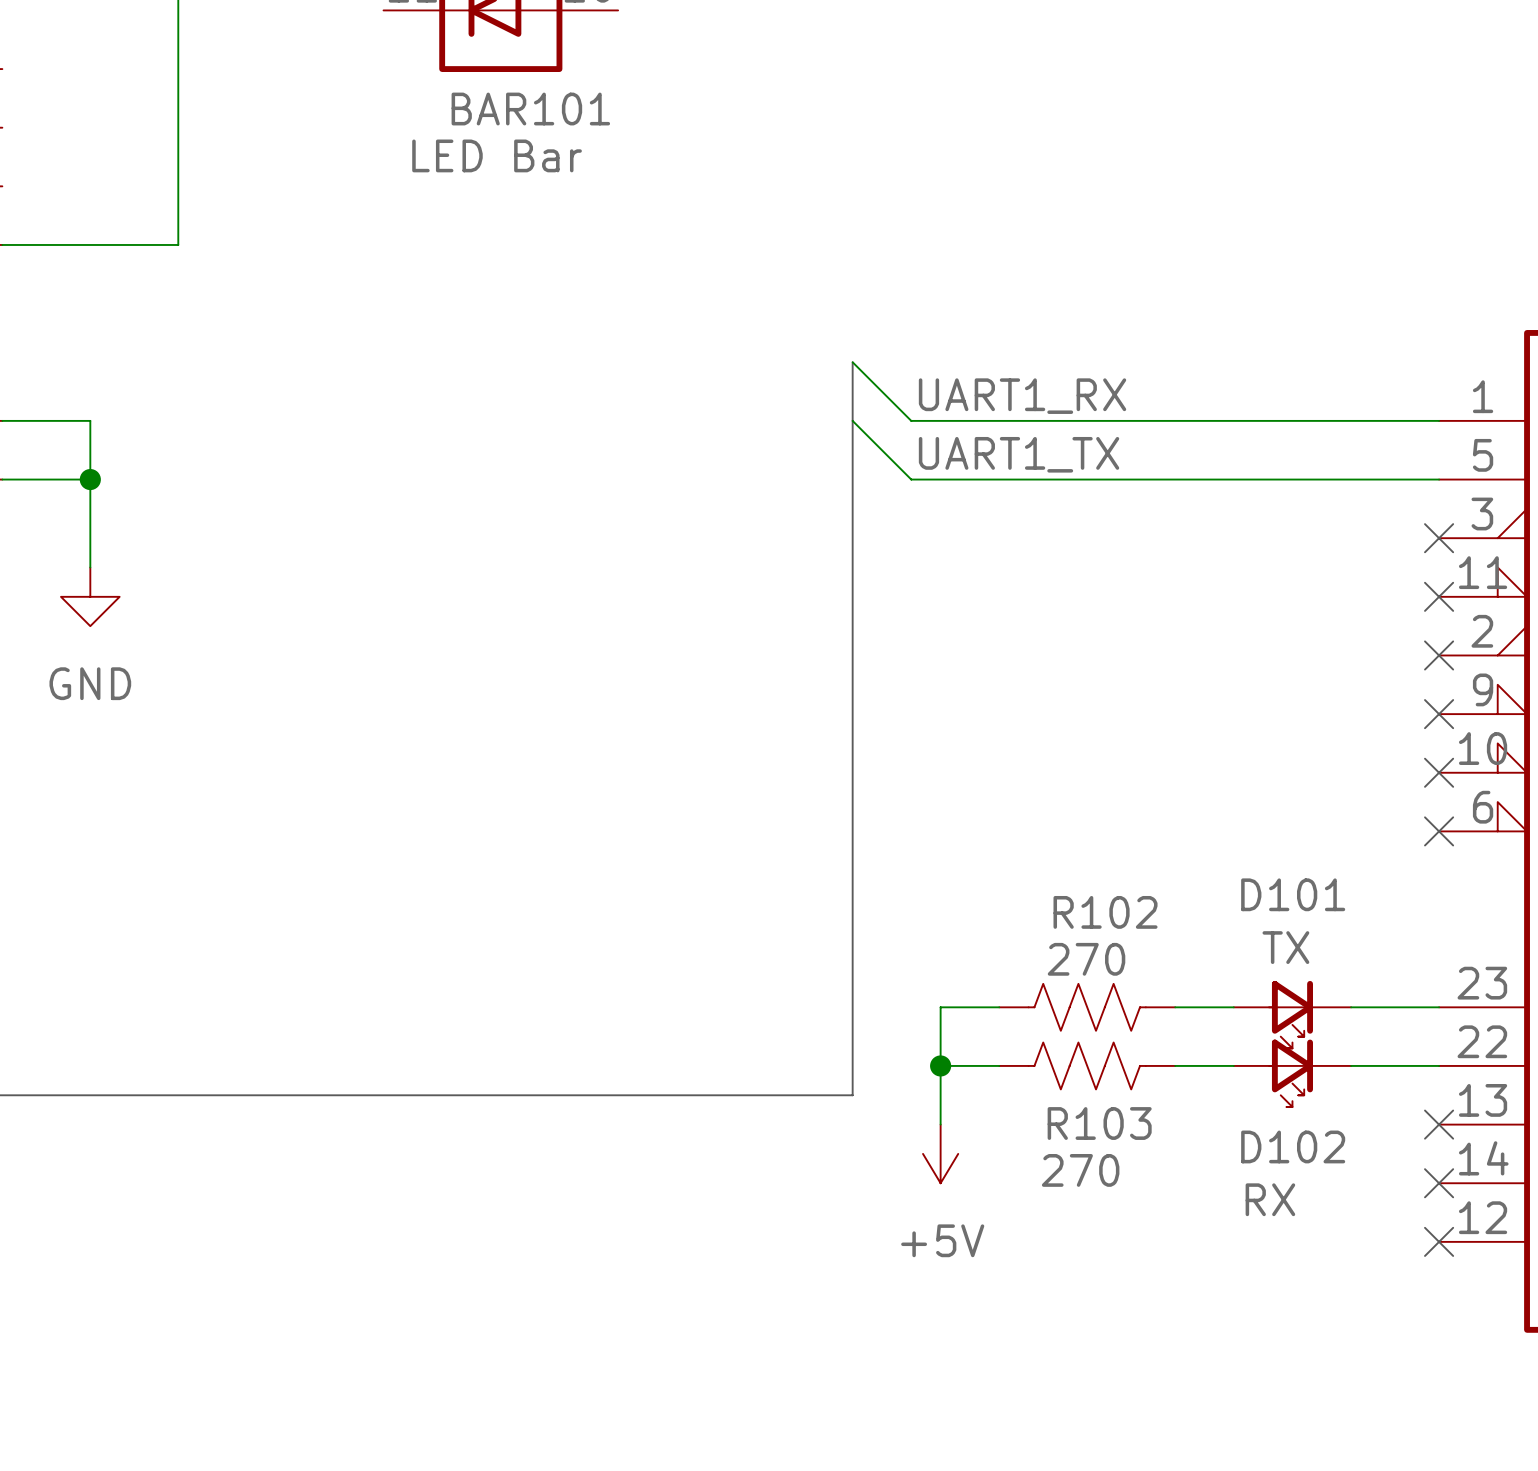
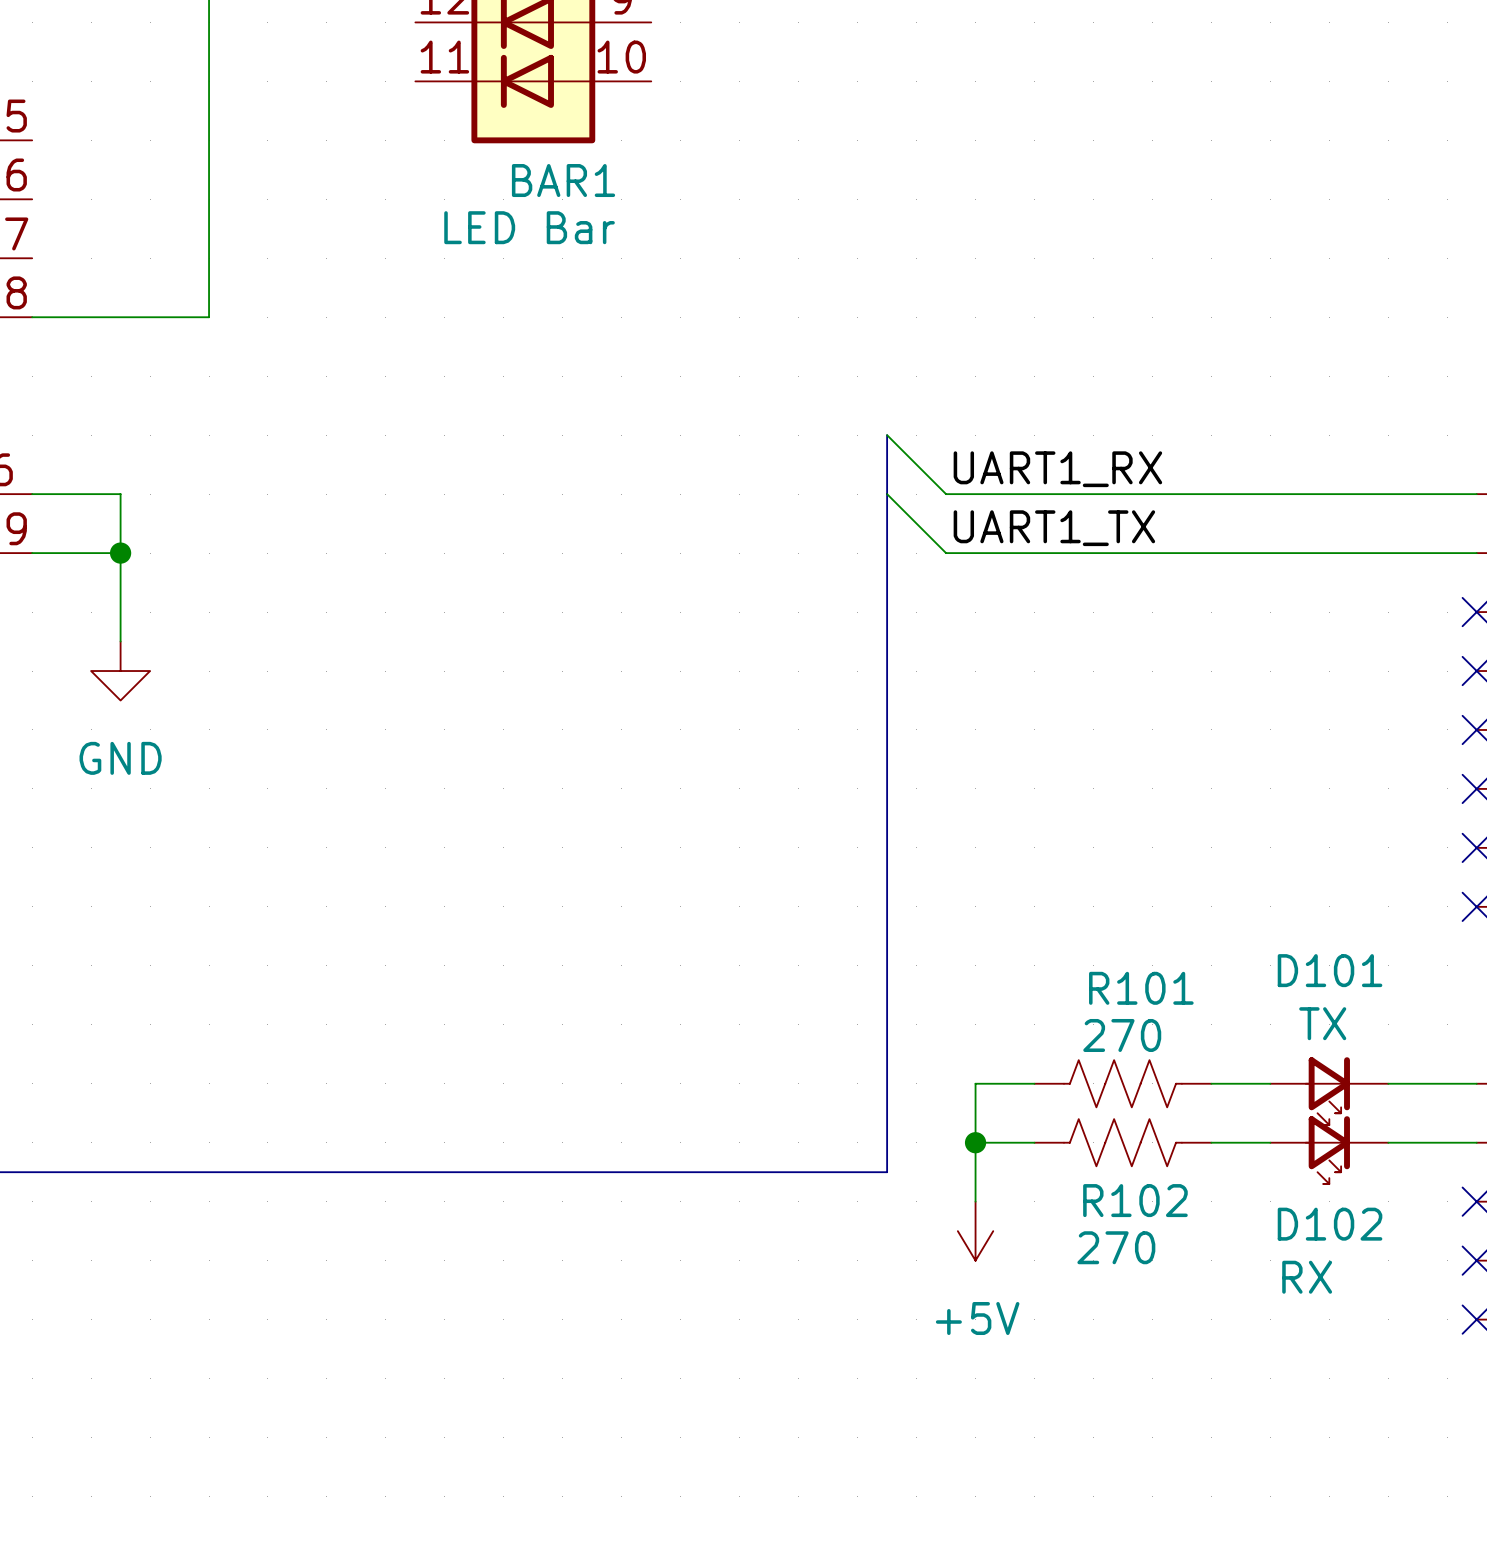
BAR101 name: BAR101 (530, 109) -> BAR1 (563, 180)
R102 name: R102 (1105, 912) -> R101 (1141, 988)
R103 name: R103 (1099, 1123) -> R102 (1135, 1200)

